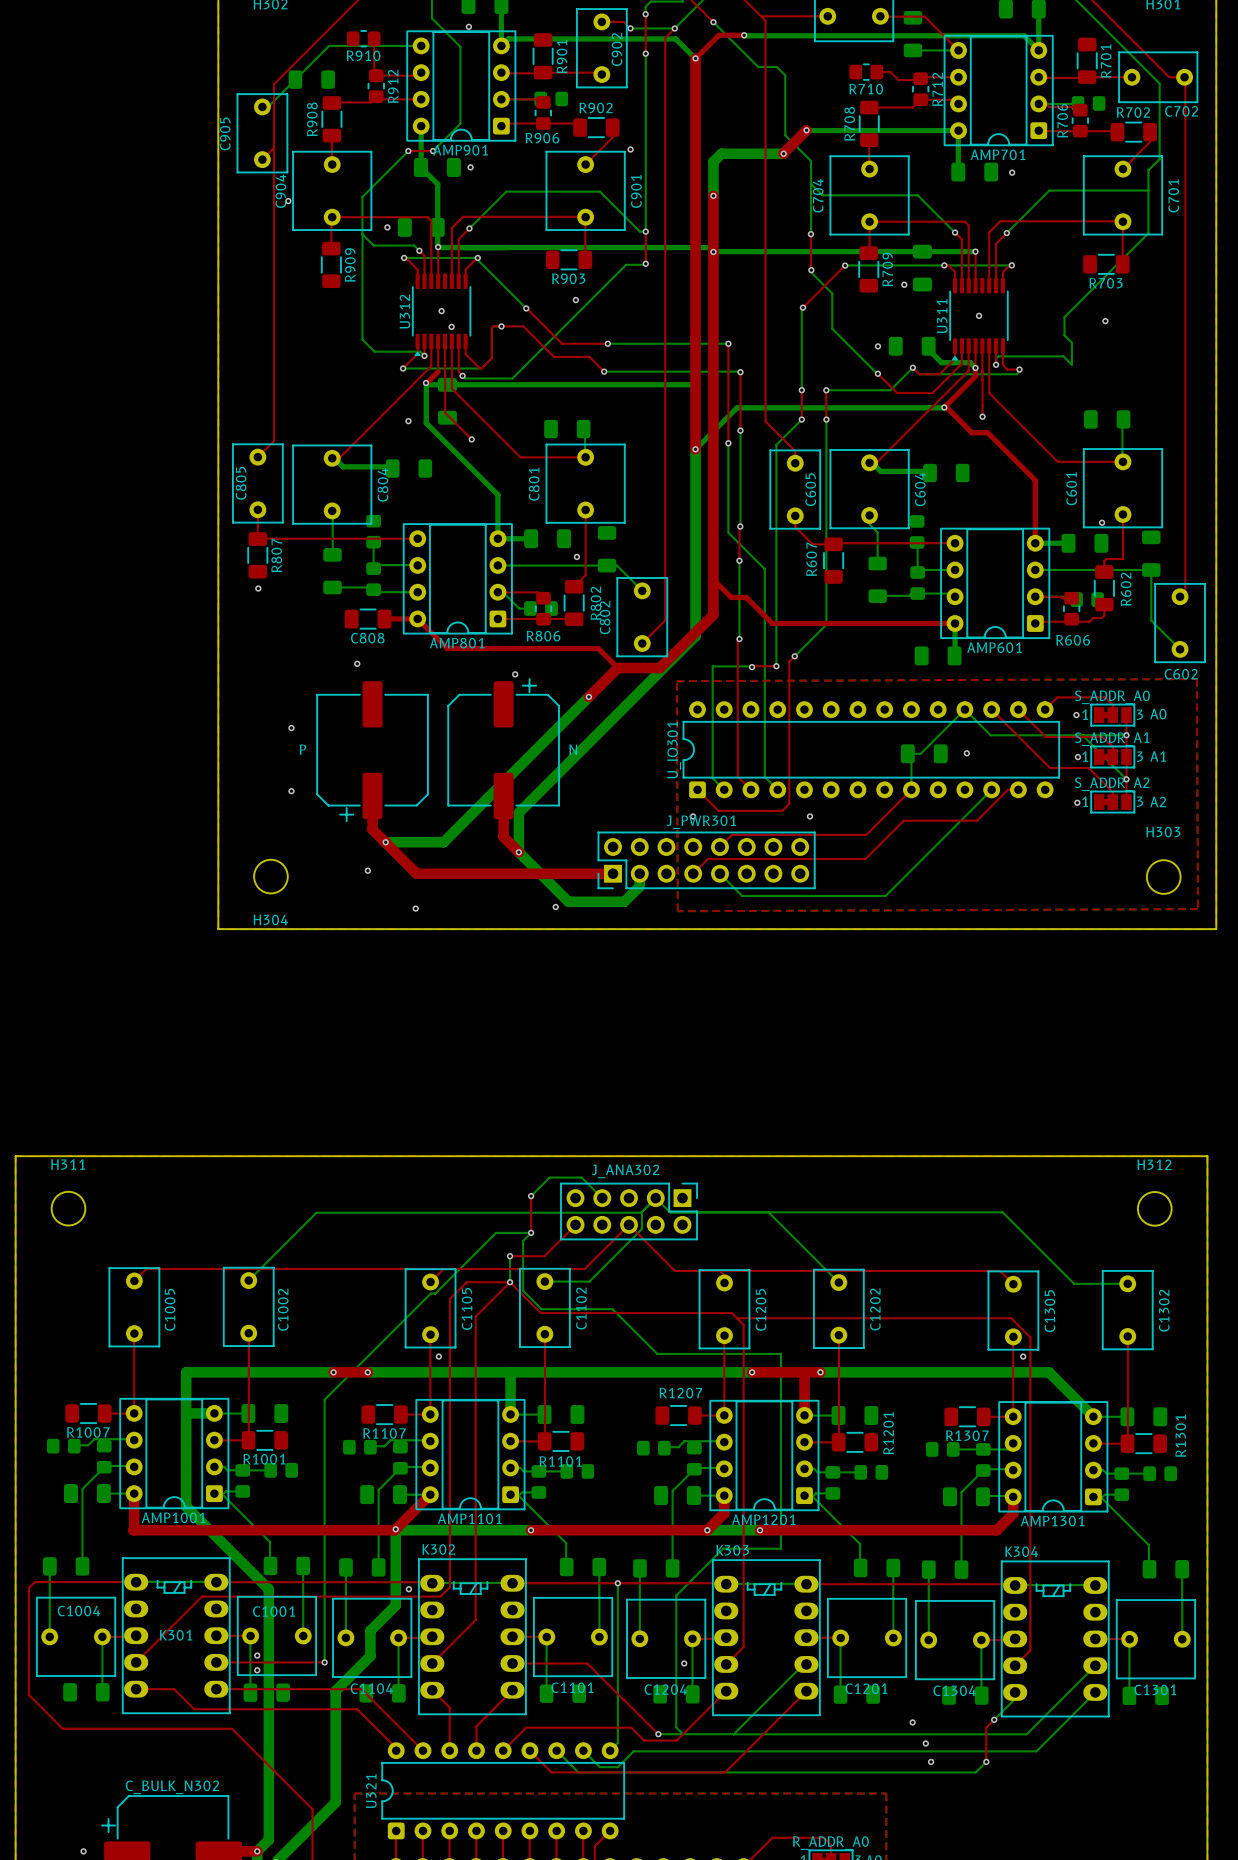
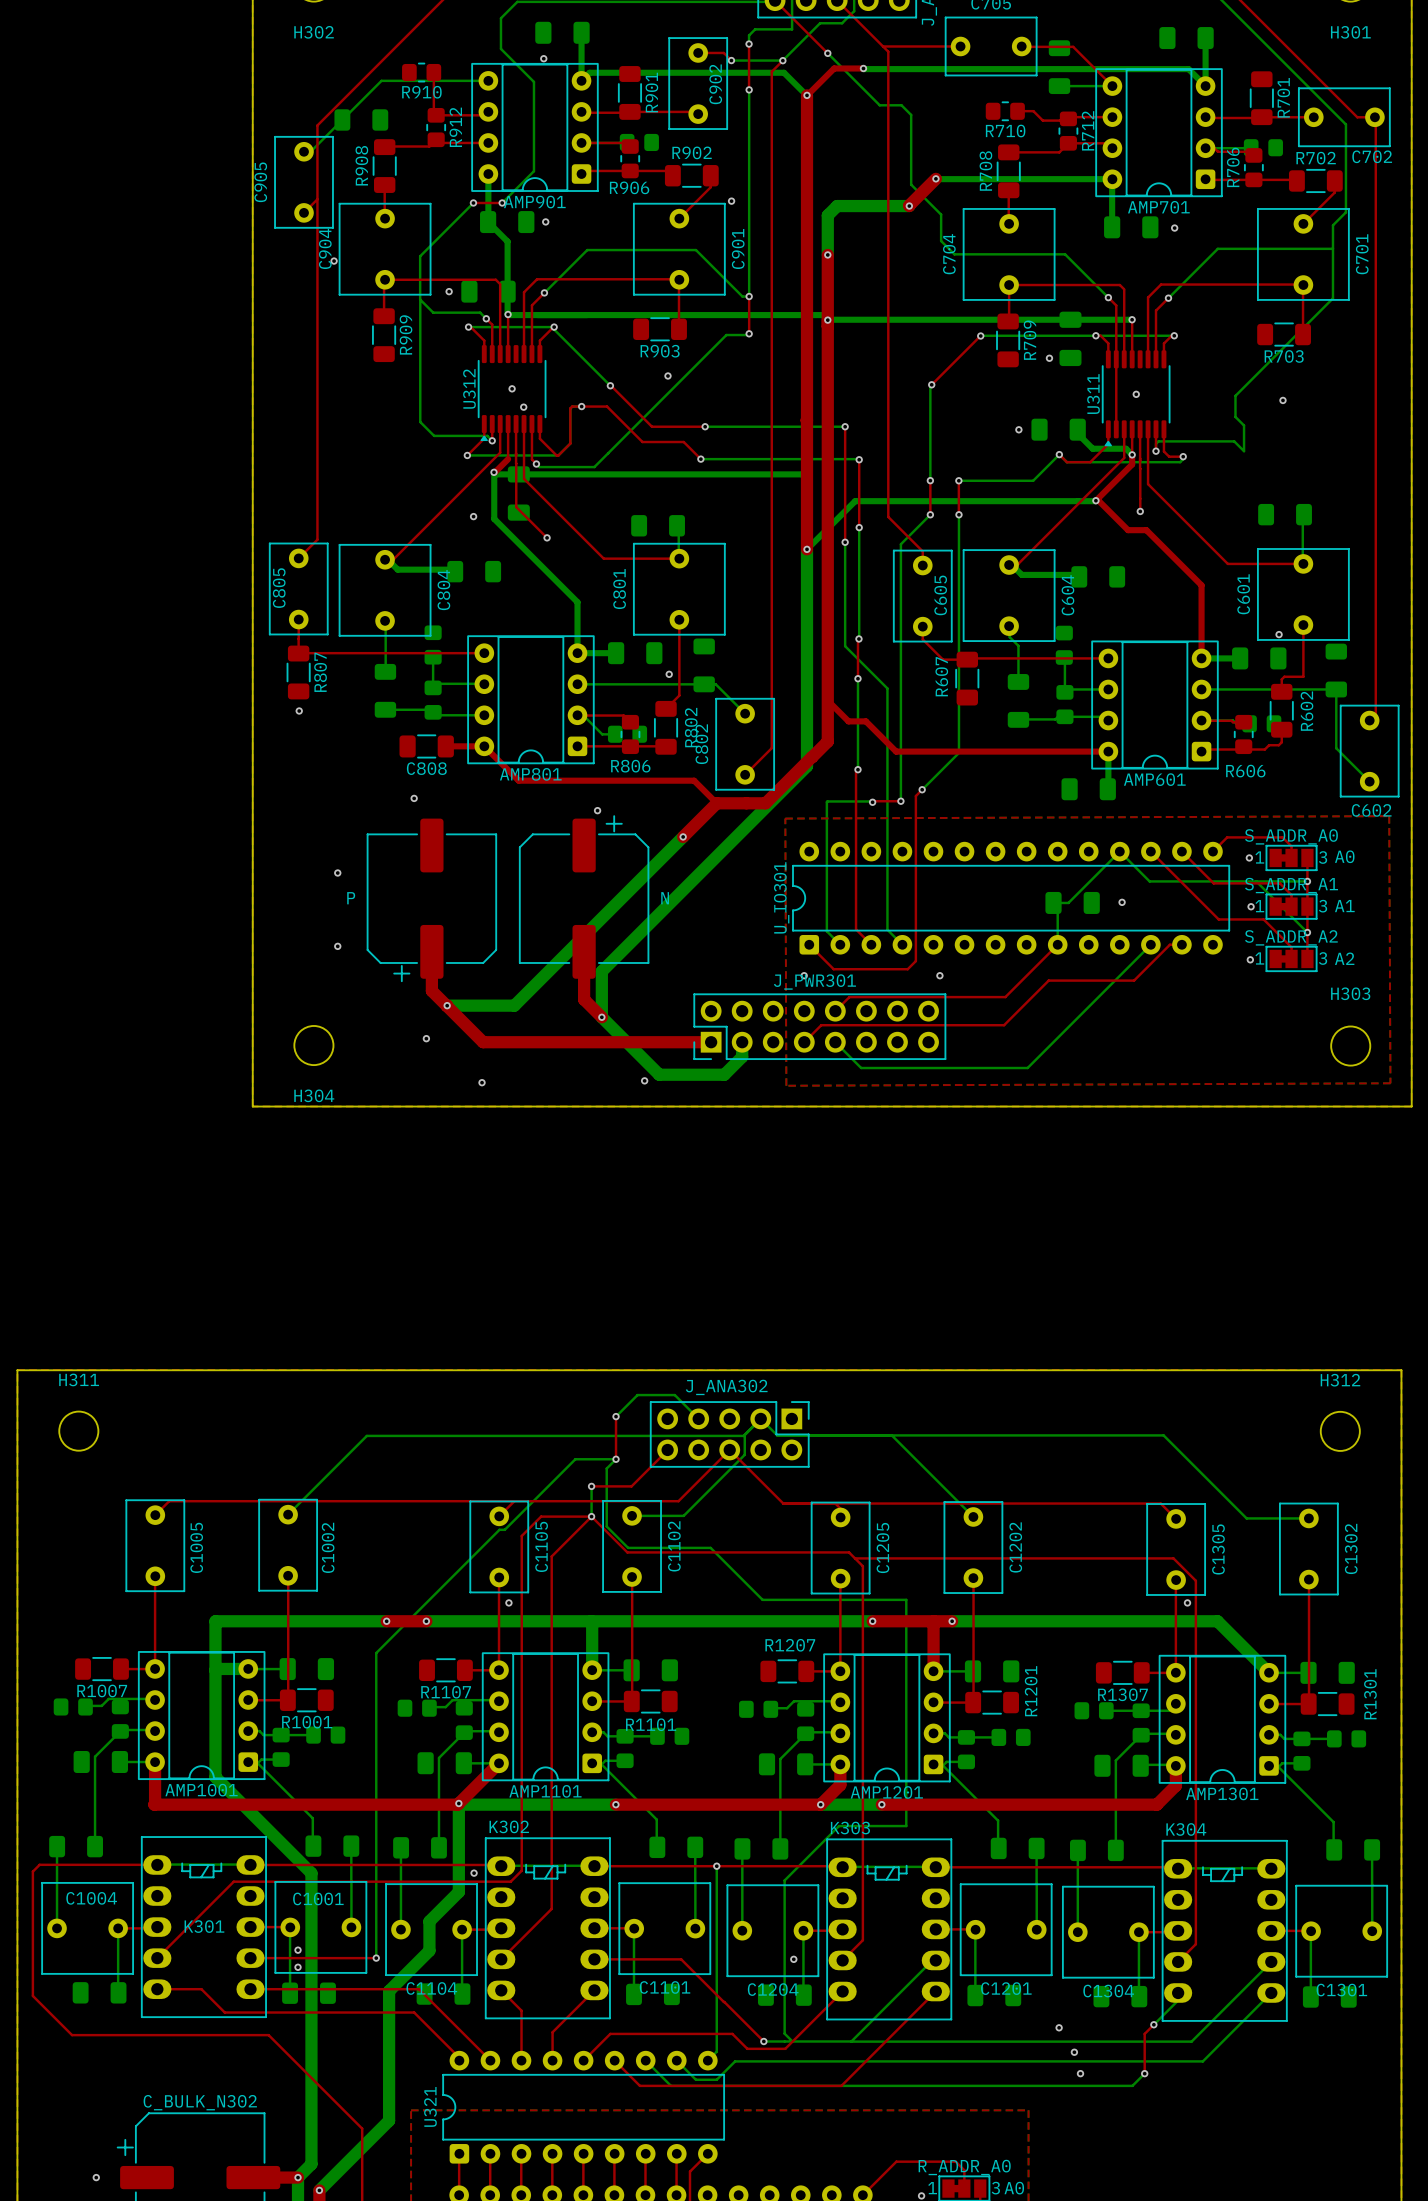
bottom track: (811, 183) (811, 234) -> none
top track: (810, 234) (811, 270) -> none
via: (810, 234) -> none
bottom track: (811, 270) (811, 272) (832, 293) (832, 328) (877, 373) -> none
via: (811, 270) -> none
top track: (961, 345) (961, 363) (932, 392) (897, 392) (877, 373) -> (1116, 429) (1116, 359)
via: (877, 373) -> none

